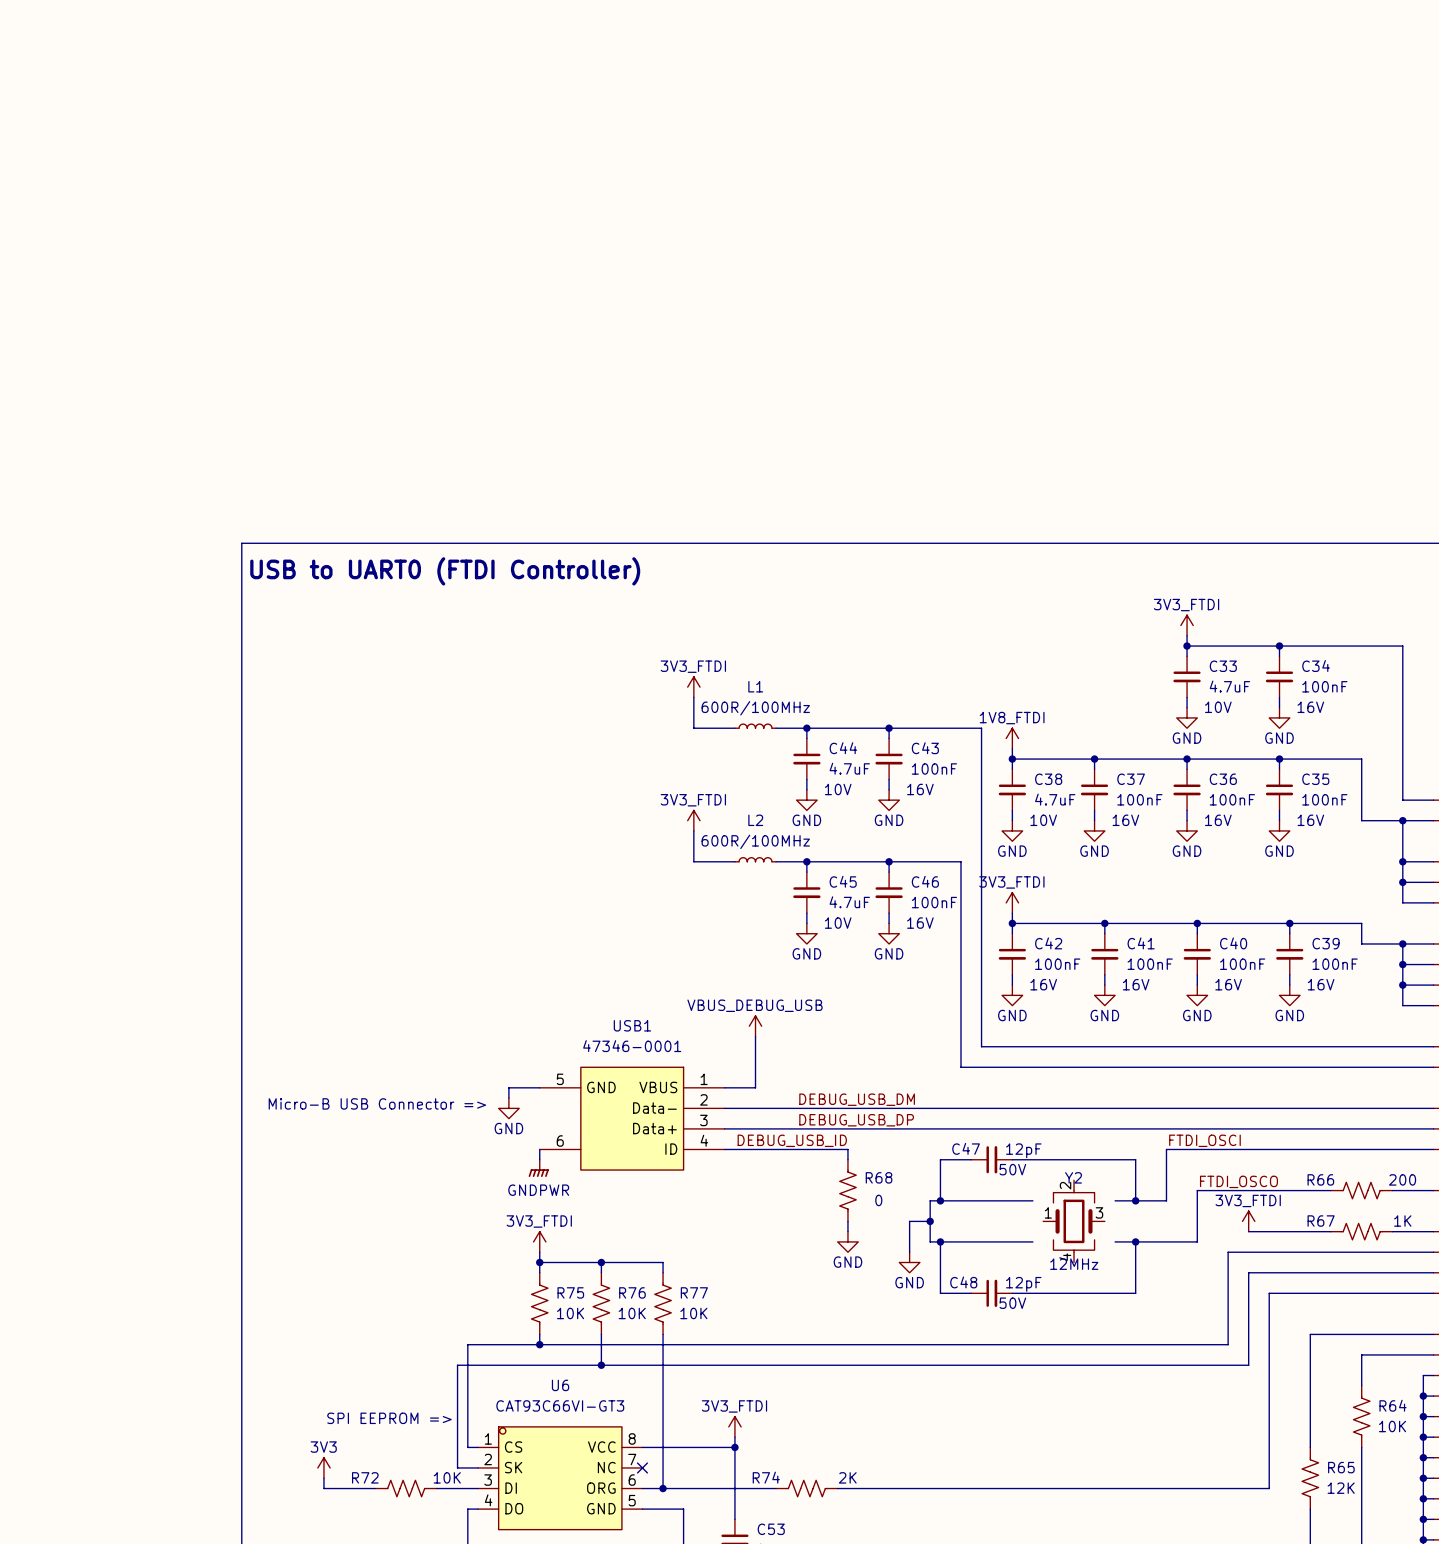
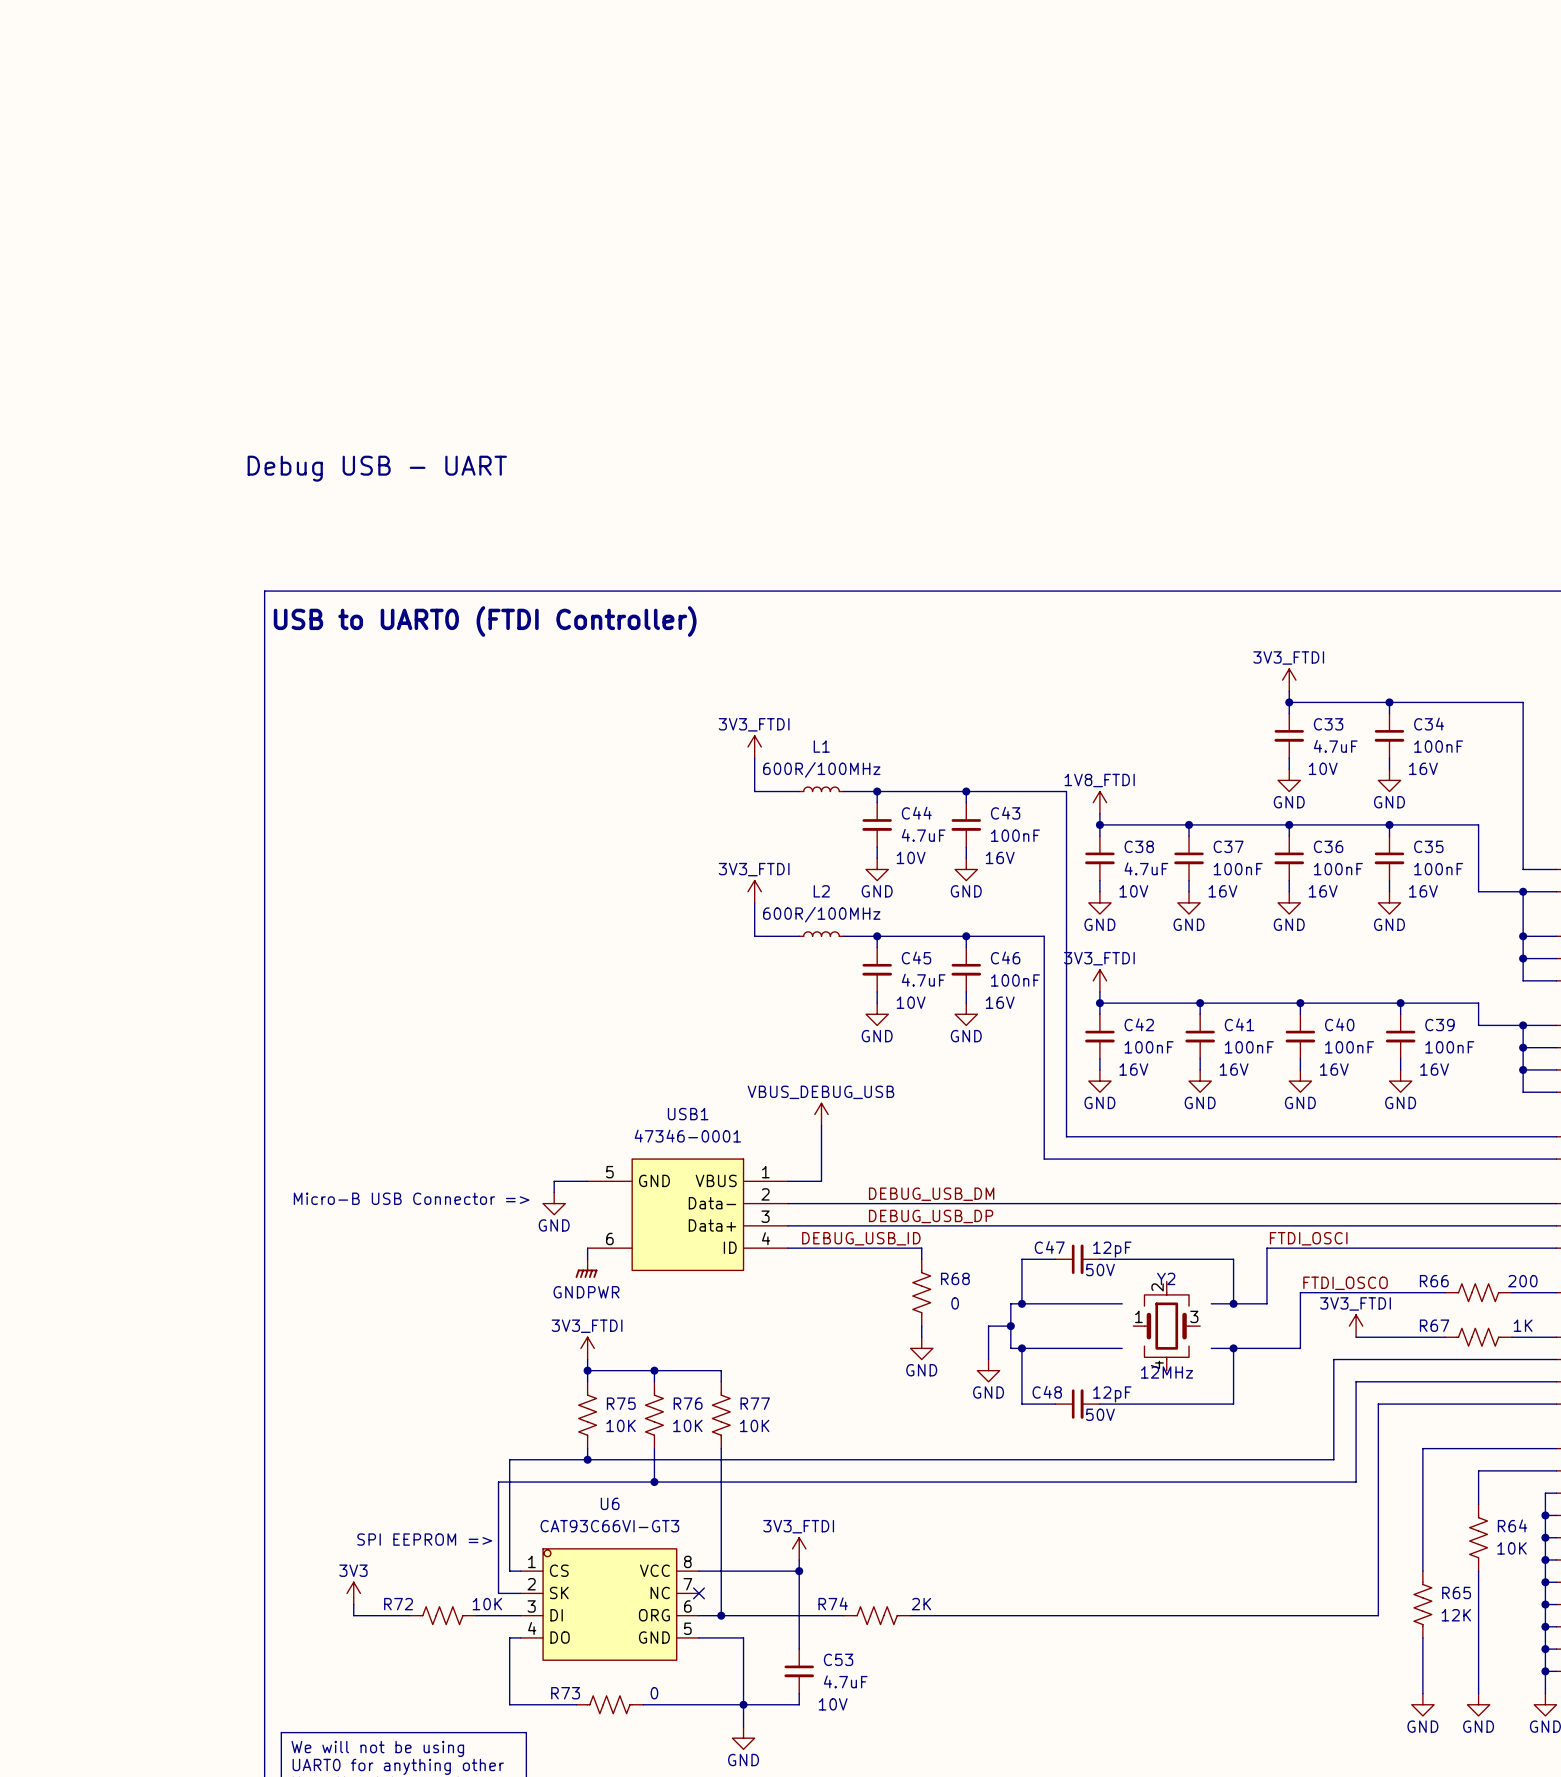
text: none -> Debug USB - UART (377, 468)

